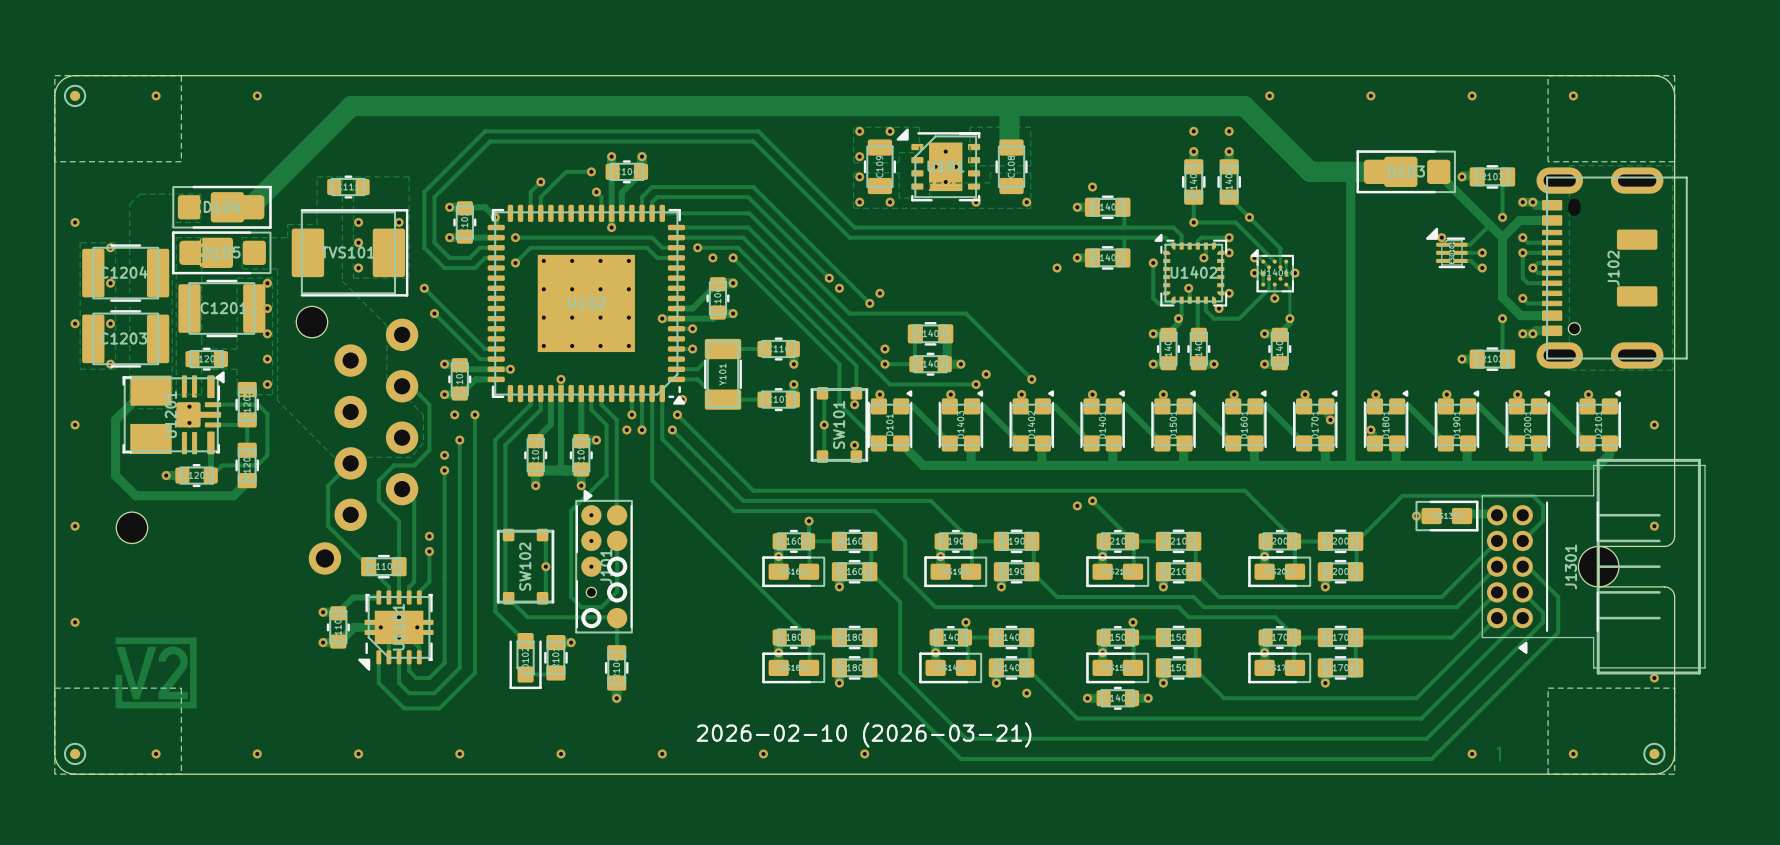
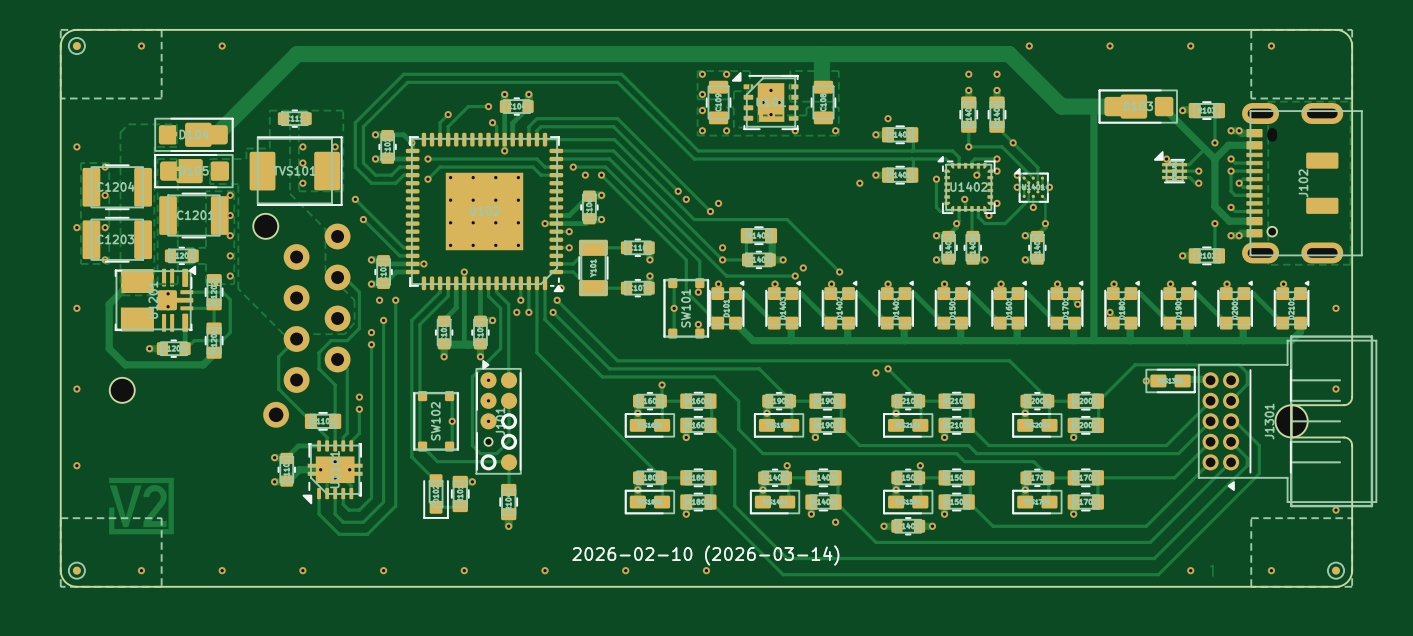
drawing shape: [696, 722, 1032, 748] -> [572, 545, 840, 566]

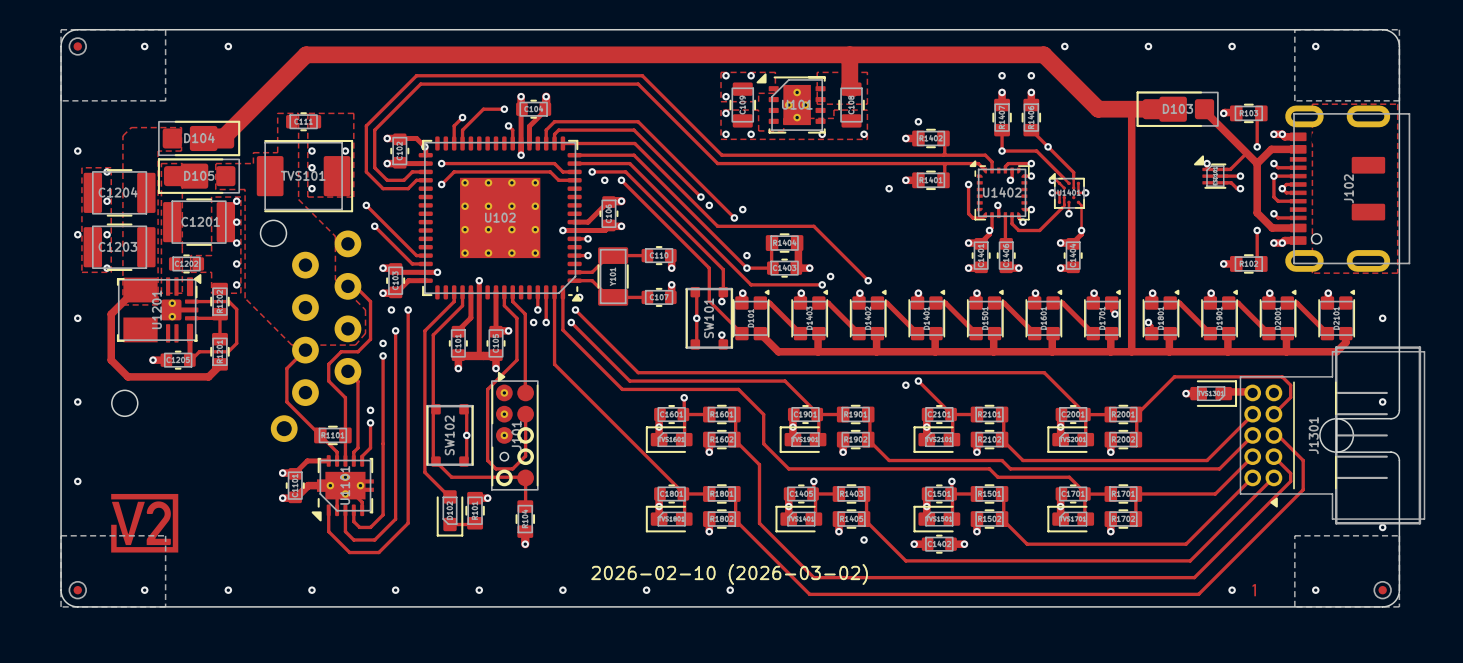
part footprint: [1145, 368, 1196, 394] -> [1190, 380, 1238, 407]
part footprint: [624, 413, 675, 438] -> [645, 426, 693, 453]
part footprint: [753, 413, 805, 438] -> [779, 426, 827, 453]
part footprint: [883, 413, 934, 438] -> [913, 426, 961, 453]
part footprint: [1012, 413, 1063, 438] -> [1047, 426, 1095, 453]
part footprint: [624, 489, 675, 515] -> [645, 505, 693, 533]
part footprint: [749, 489, 801, 515] -> [775, 505, 823, 533]
part footprint: [883, 489, 934, 515] -> [913, 505, 961, 533]
part footprint: [1012, 489, 1063, 515] -> [1047, 505, 1095, 533]
drawing shape: [572, 545, 840, 566] -> [591, 564, 868, 585]

